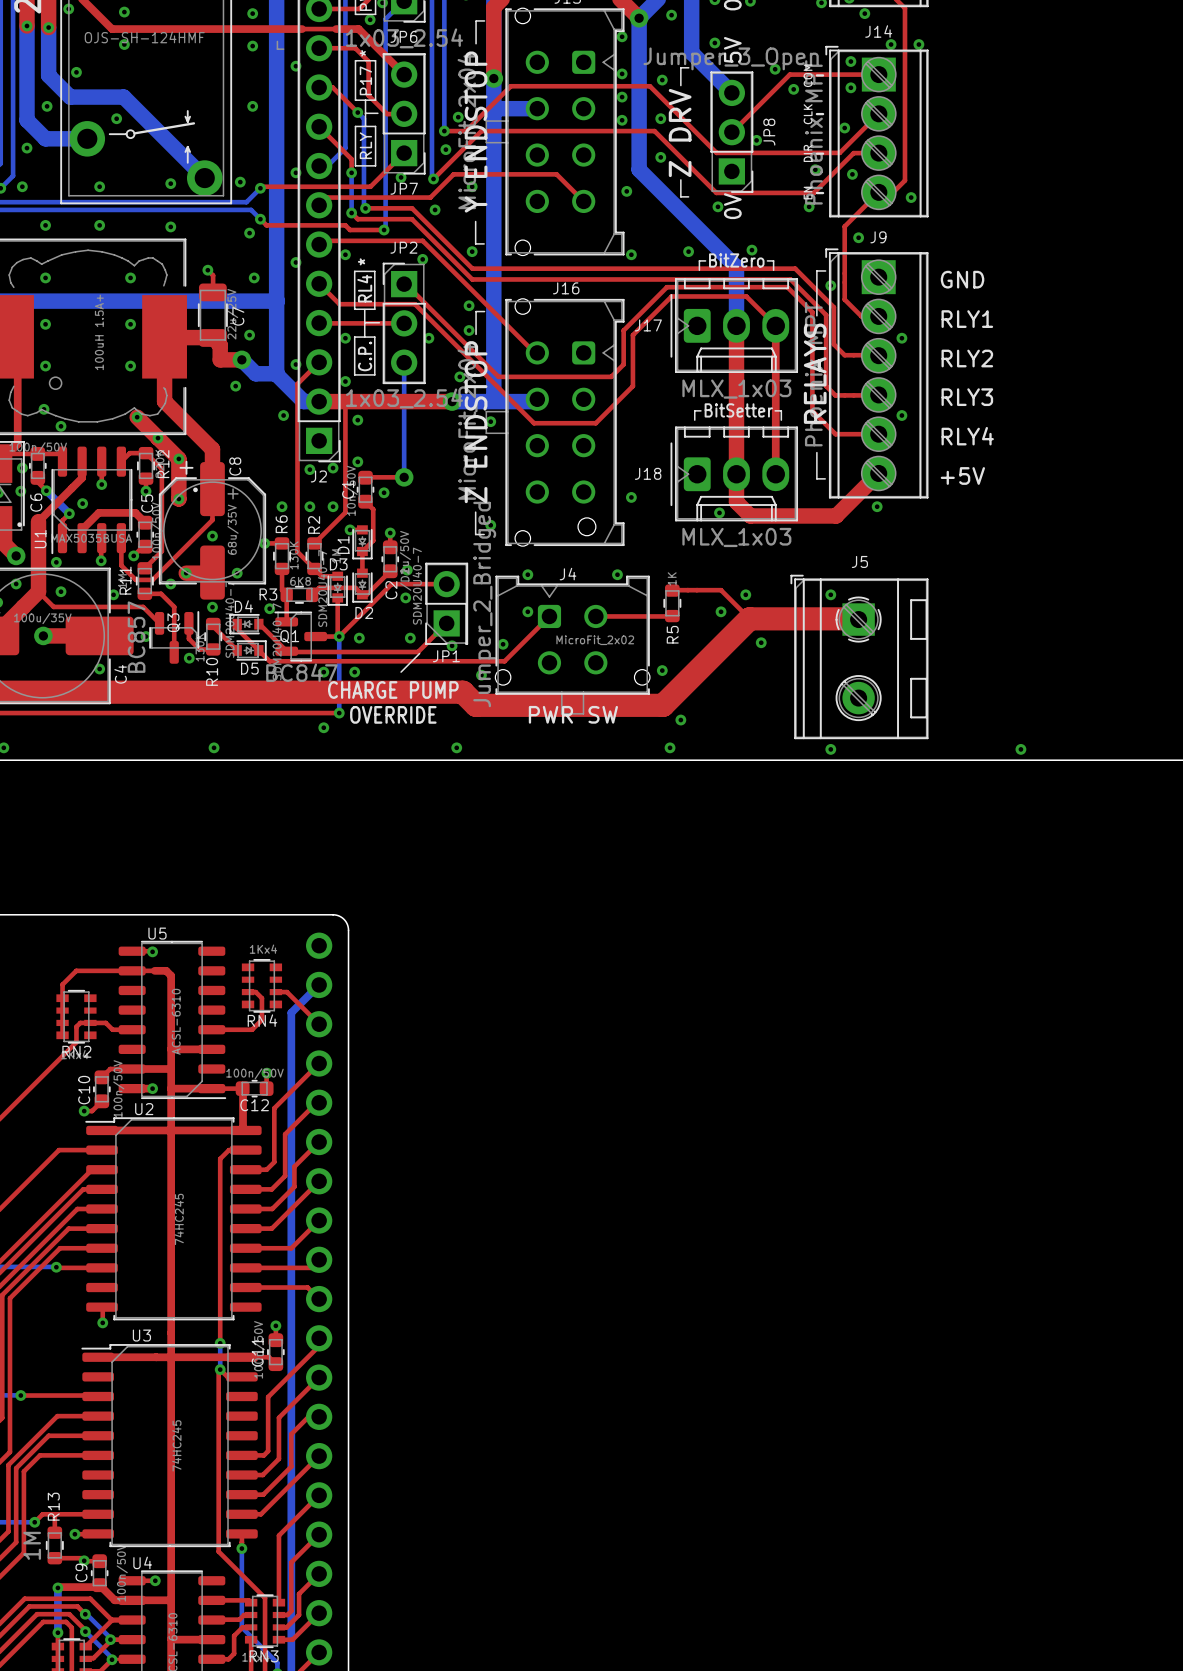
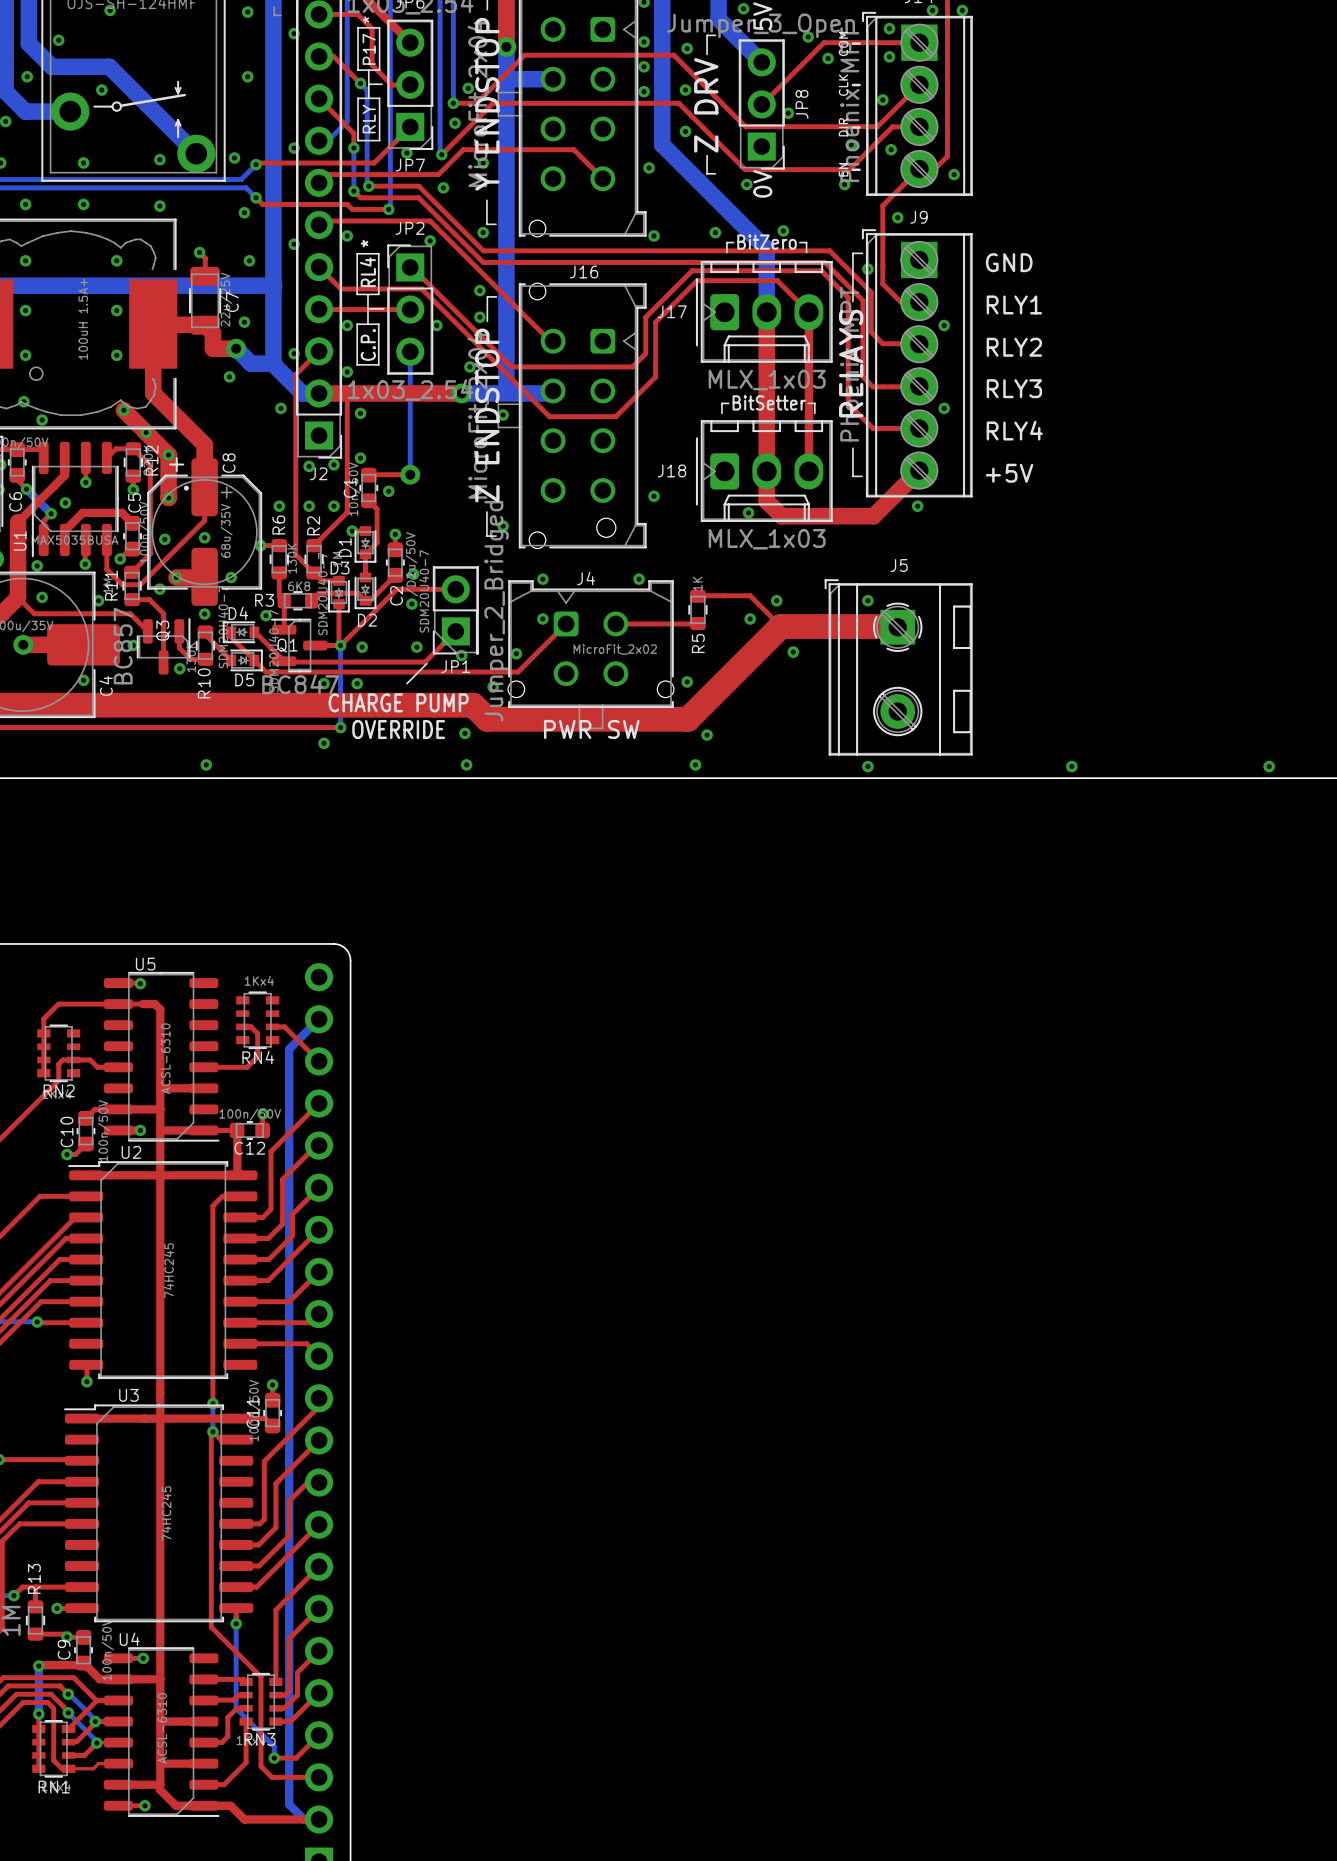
via: none -> (164, 539)
via: none -> (464, 733)

